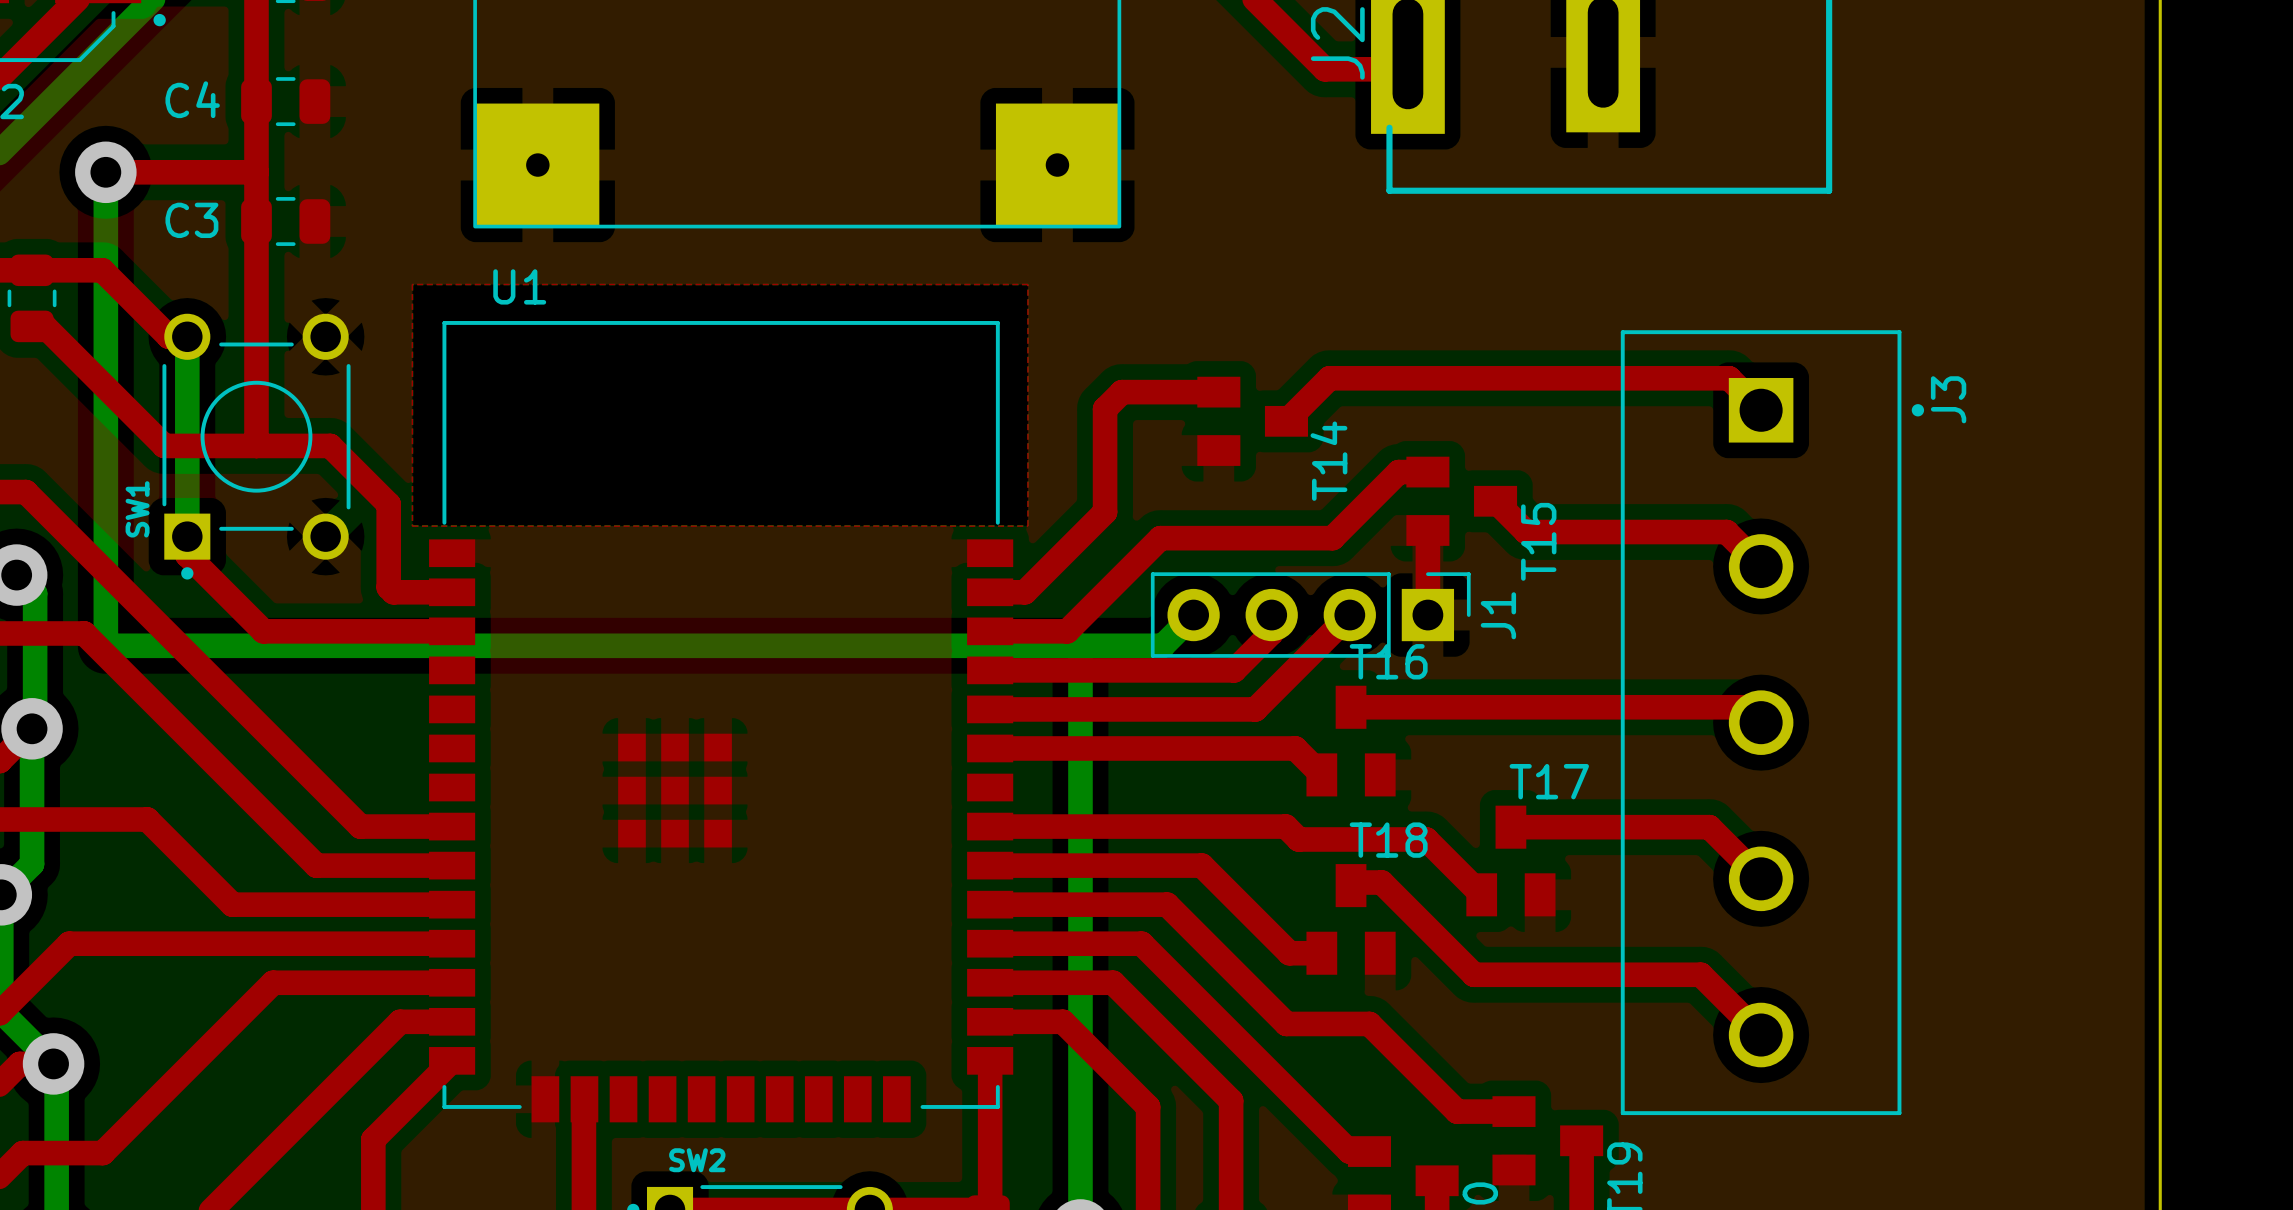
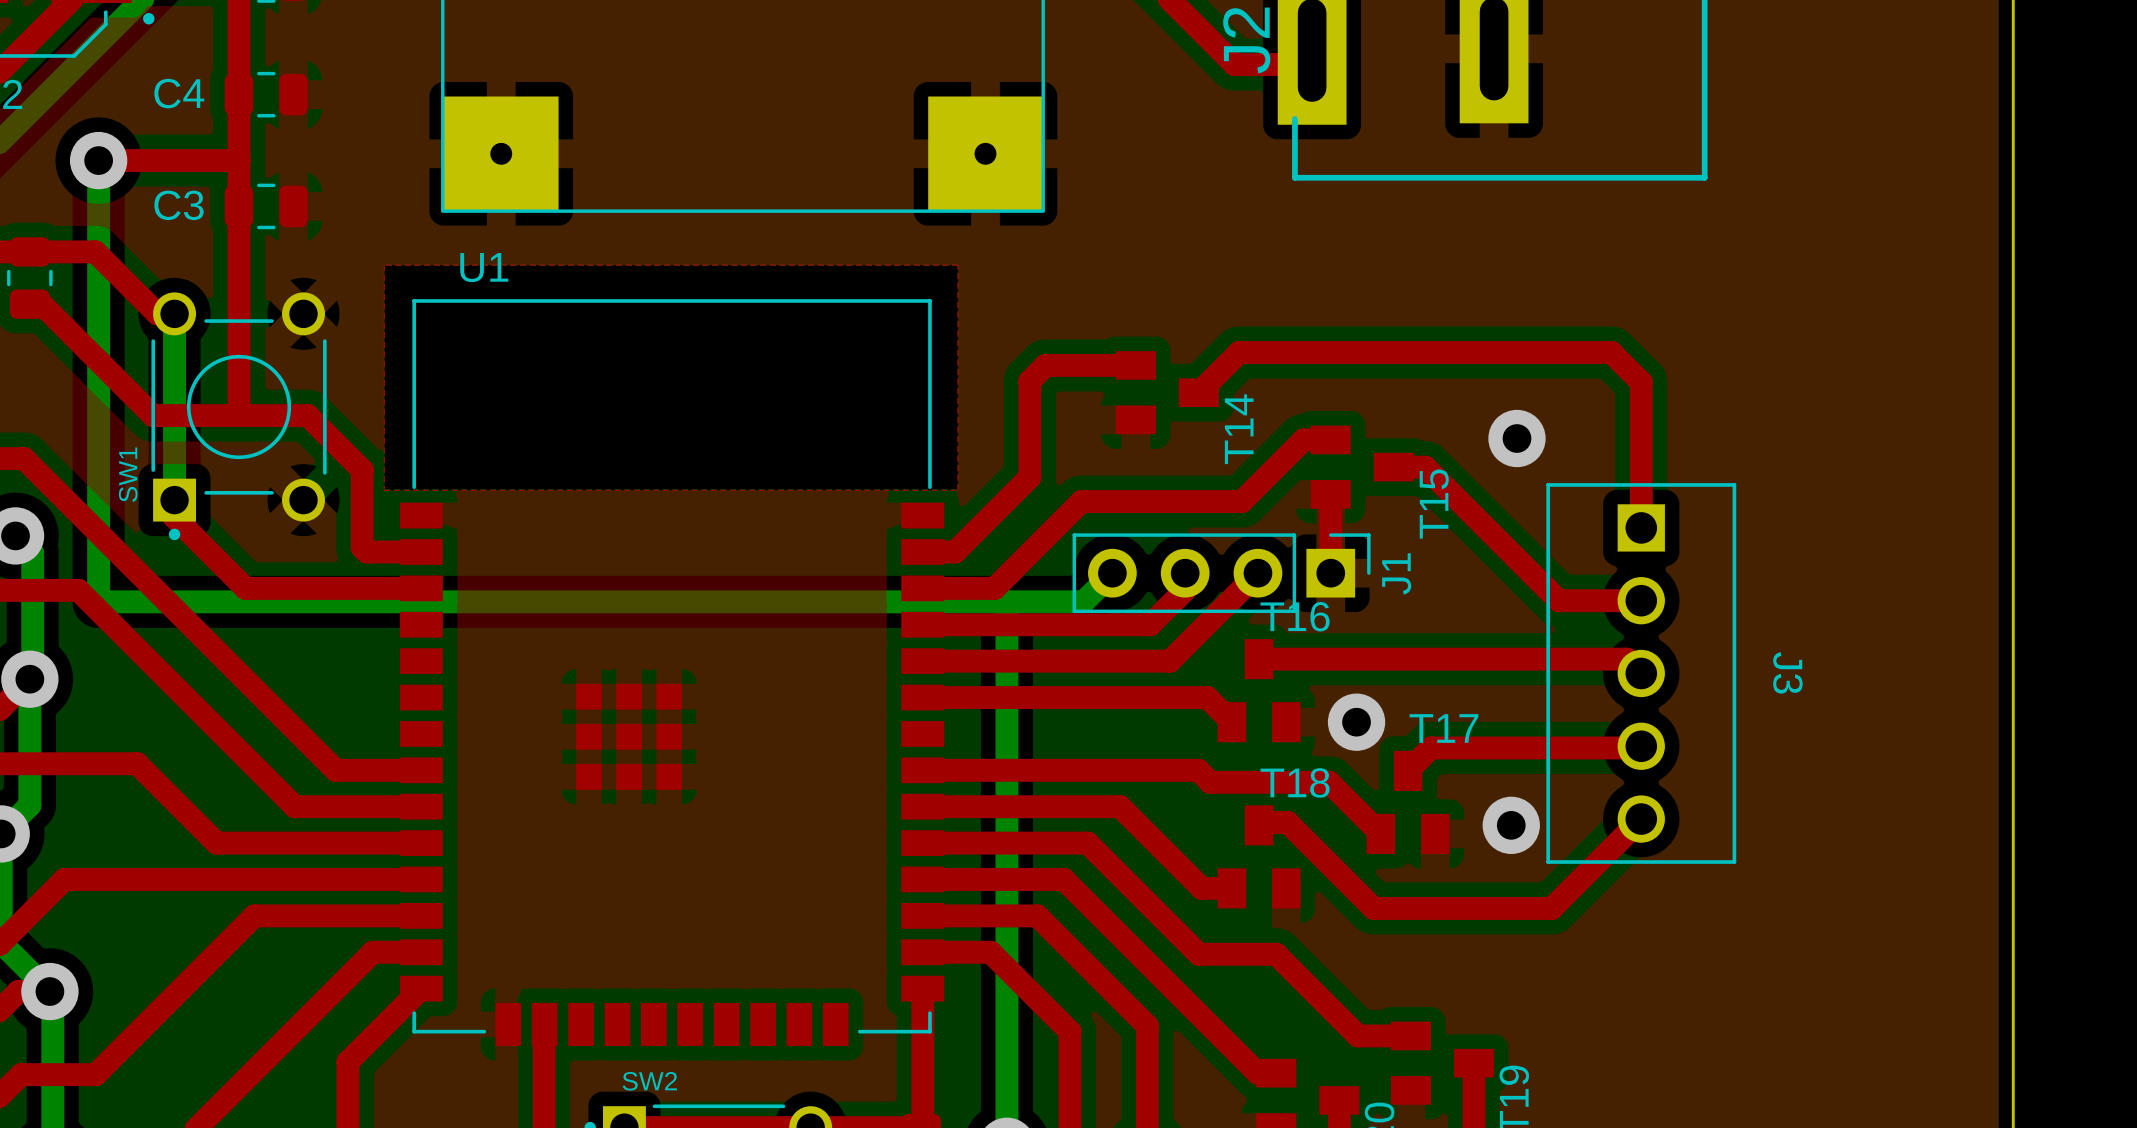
J3 footprint: [1620, 330, 1925, 1116] -> [1546, 483, 1737, 864]
J3 name position: J3 (1948, 399) -> J3 (1787, 672)
top track: none -> (1641, 382) (1641, 527)
via: none -> (1517, 438)
top track: (1495, 501) (1526, 532) (1726, 532) (1761, 566) -> (1393, 467) (1425, 467) (1558, 600) (1641, 600)
via: none -> (1356, 722)
top track: (1510, 827) (1709, 827) (1761, 878) -> (1408, 770) (1431, 747) (1639, 747) (1641, 746)
via: none -> (1511, 825)
top track: (1665, 974) (1700, 974) (1761, 1035) -> (1551, 908) (1641, 819)

